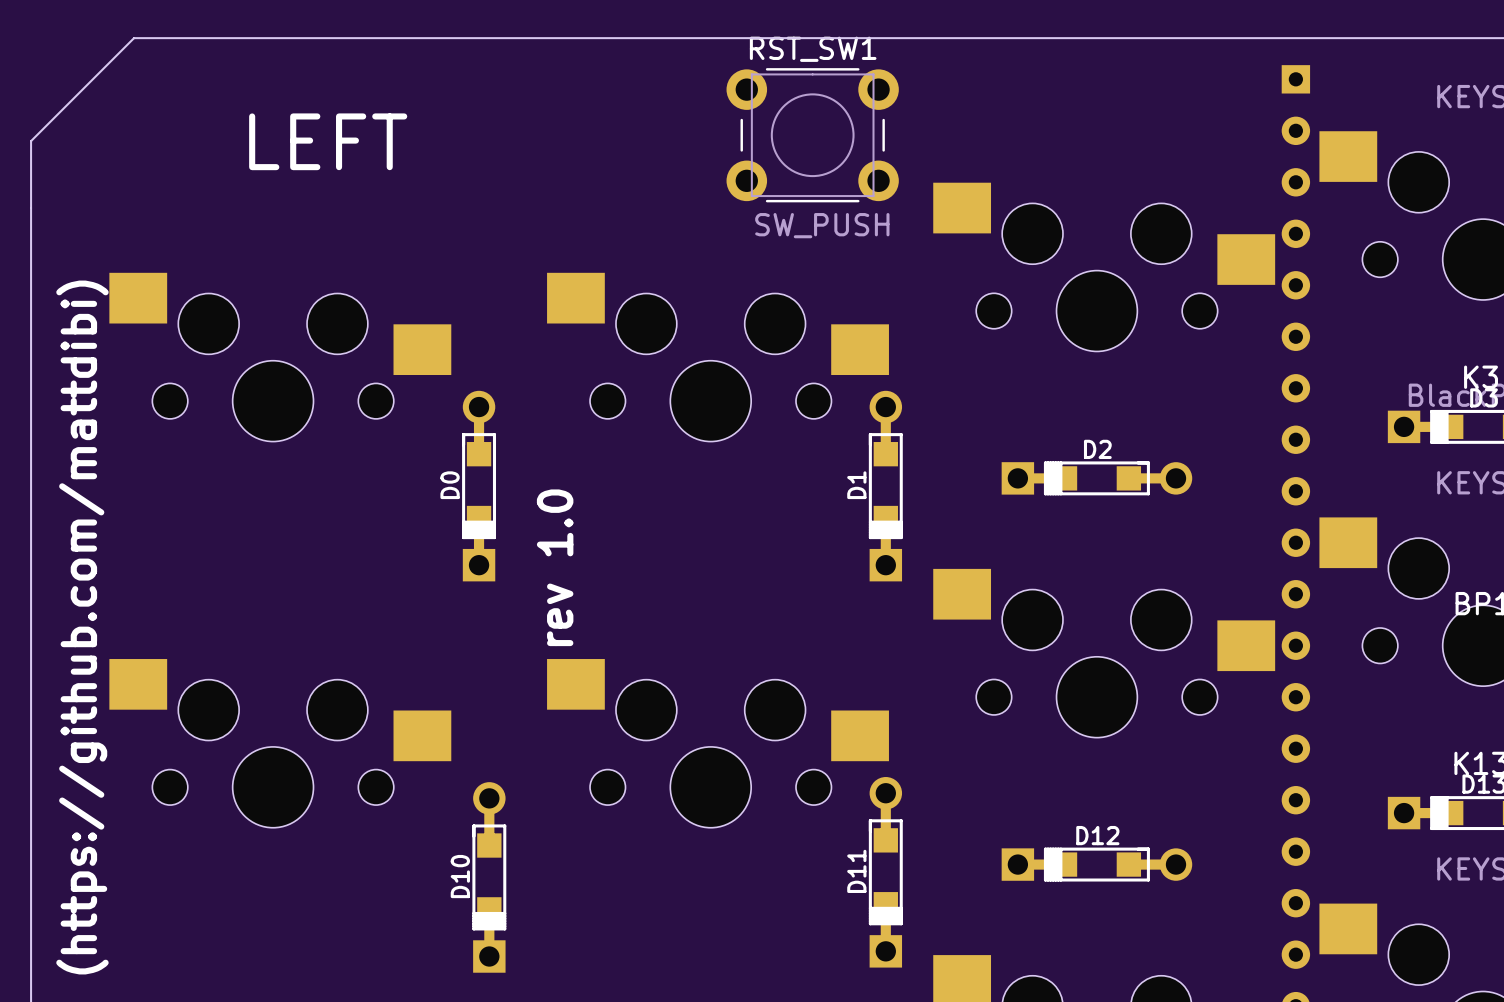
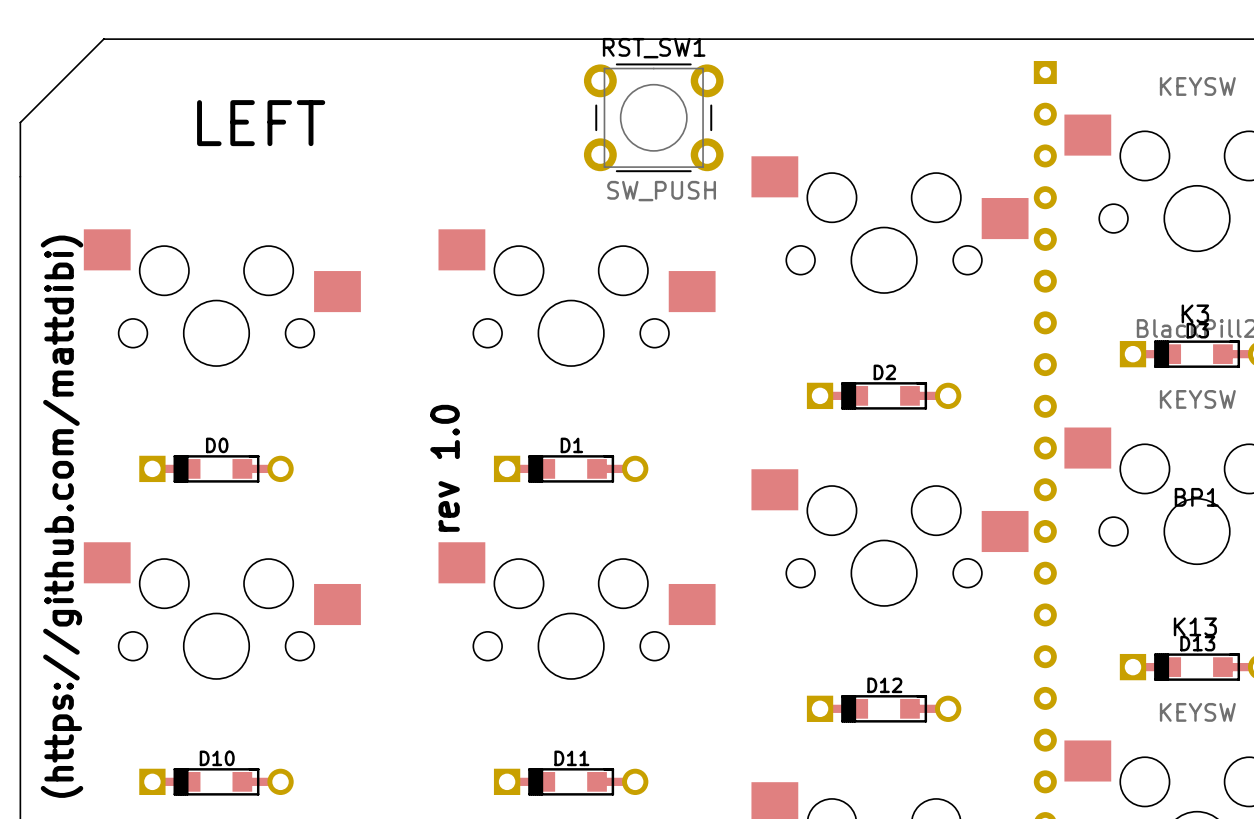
D0 rotation: 0° (479, 486) -> 90° clockwise (216, 468)
D0 position: (479, 486) -> (216, 468)
D1 rotation: 0° (885, 486) -> 90° clockwise (571, 468)
D1 position: (885, 486) -> (571, 468)
D11 rotation: 0° (885, 872) -> 90° clockwise (571, 781)
D11 position: (885, 872) -> (571, 781)
D10 rotation: 0° (489, 877) -> 90° clockwise (216, 781)
D10 position: (489, 877) -> (216, 781)

